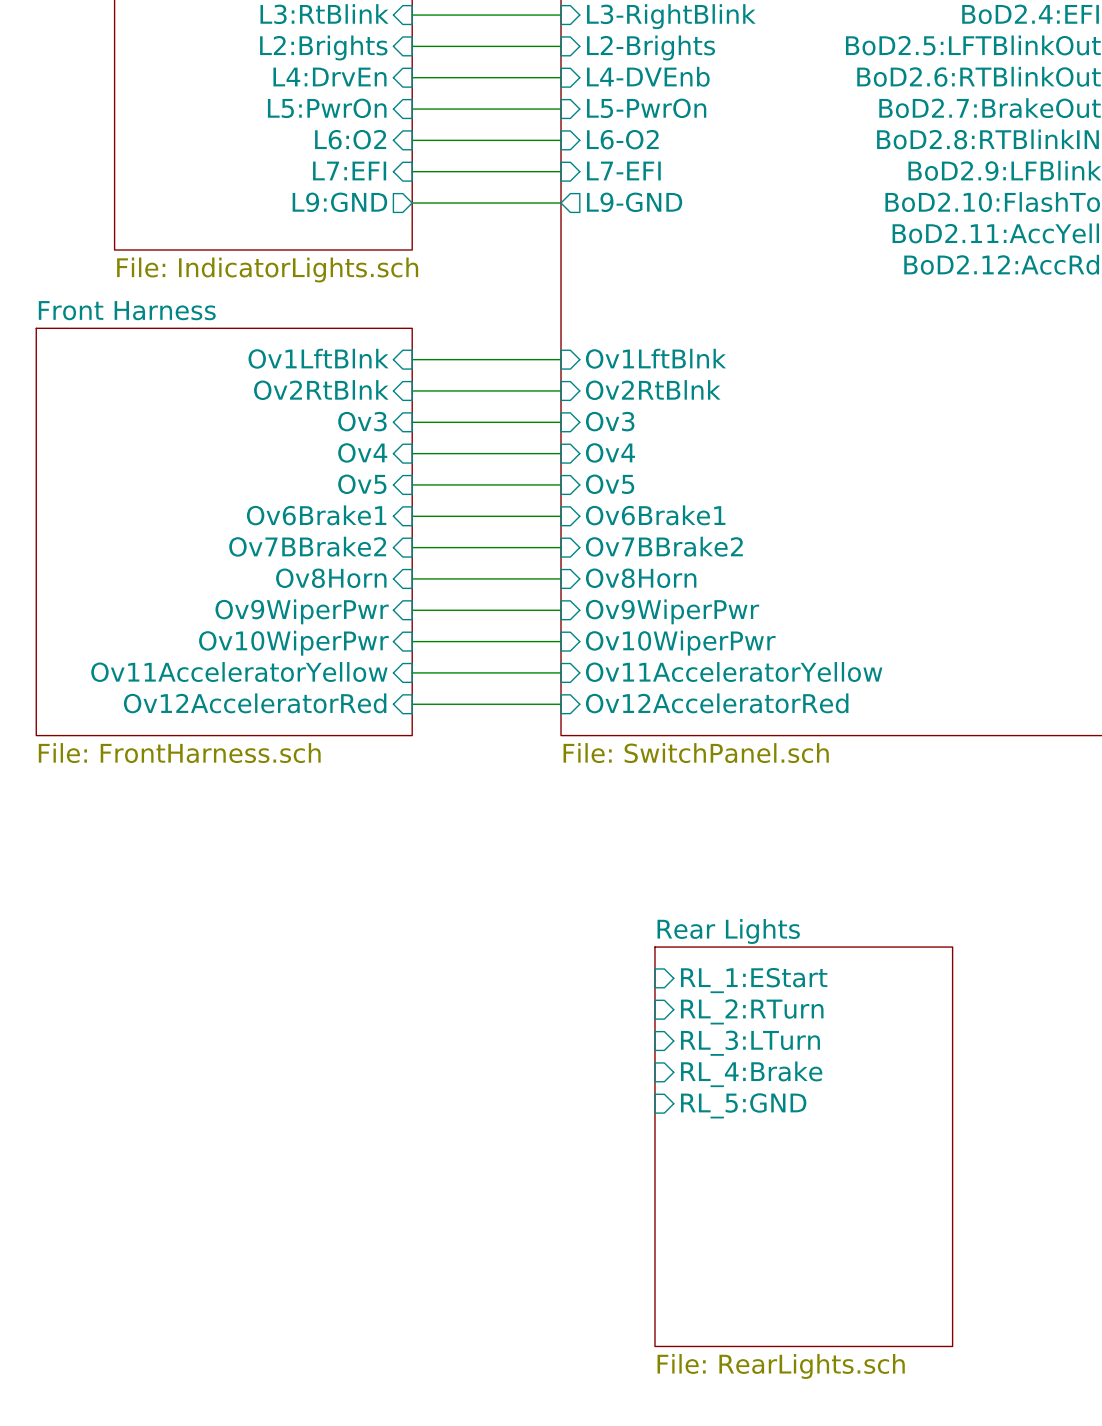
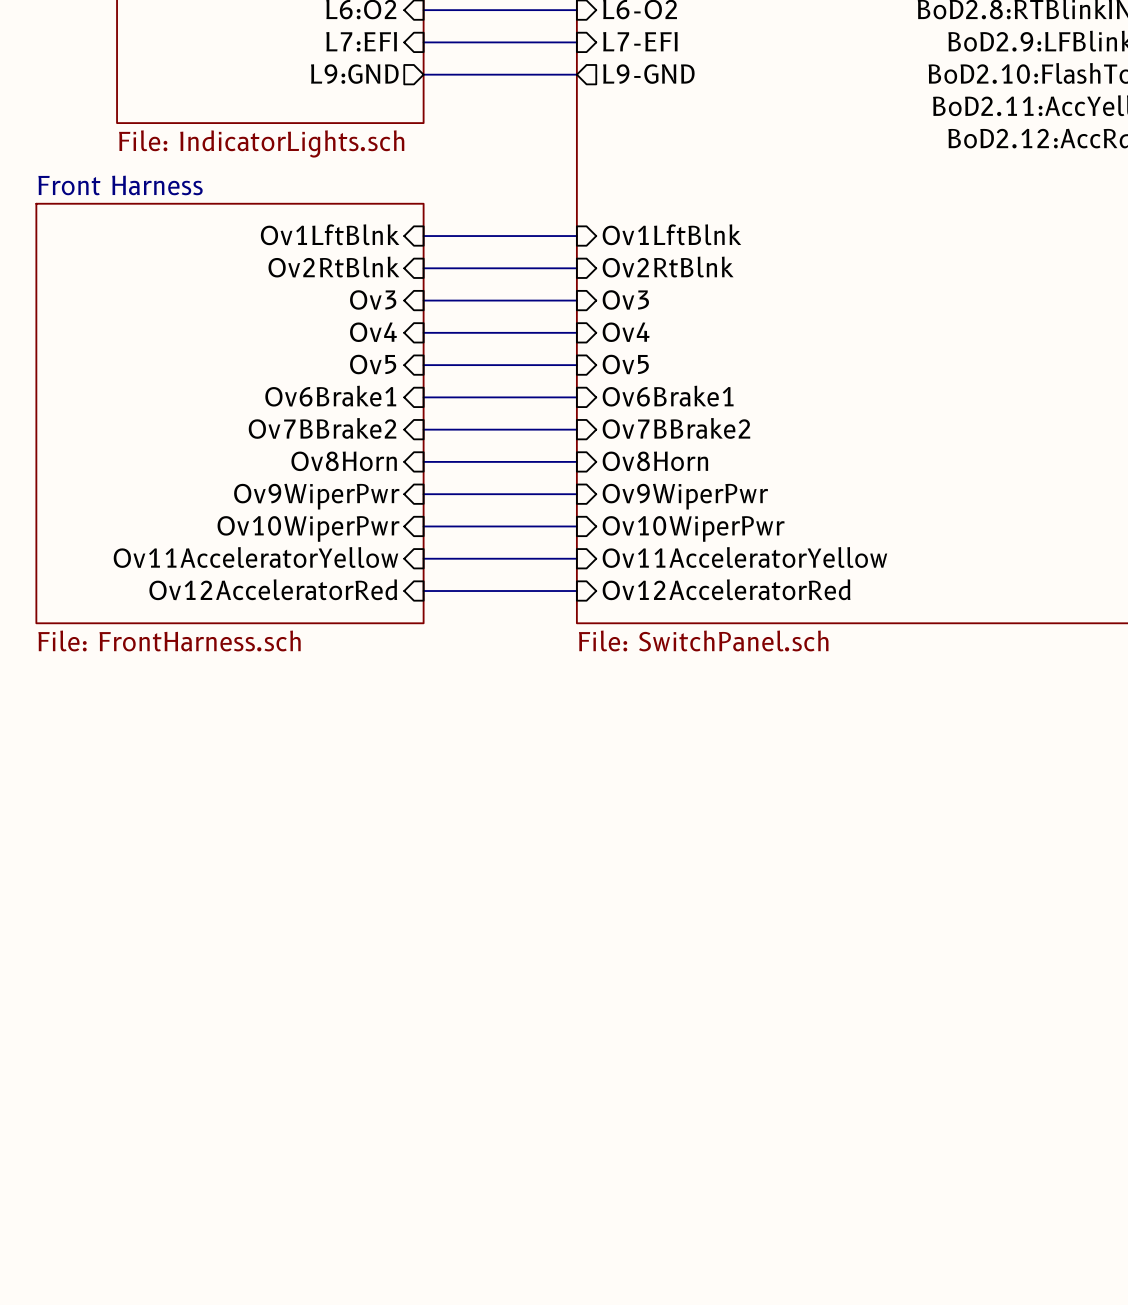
sheet pin: RL_1:EStart (754, 980) -> none
sheet pin: RL_2:RTurn (752, 1011) -> none
sheet pin: RL_3:LTurn (750, 1043) -> none
sheet pin: RL_4:Brake (751, 1074) -> none
sheet pin: RL_5:GND (743, 1105) -> none
sheet Rear Lights: File: RearLights.sch (803, 1146) -> none

